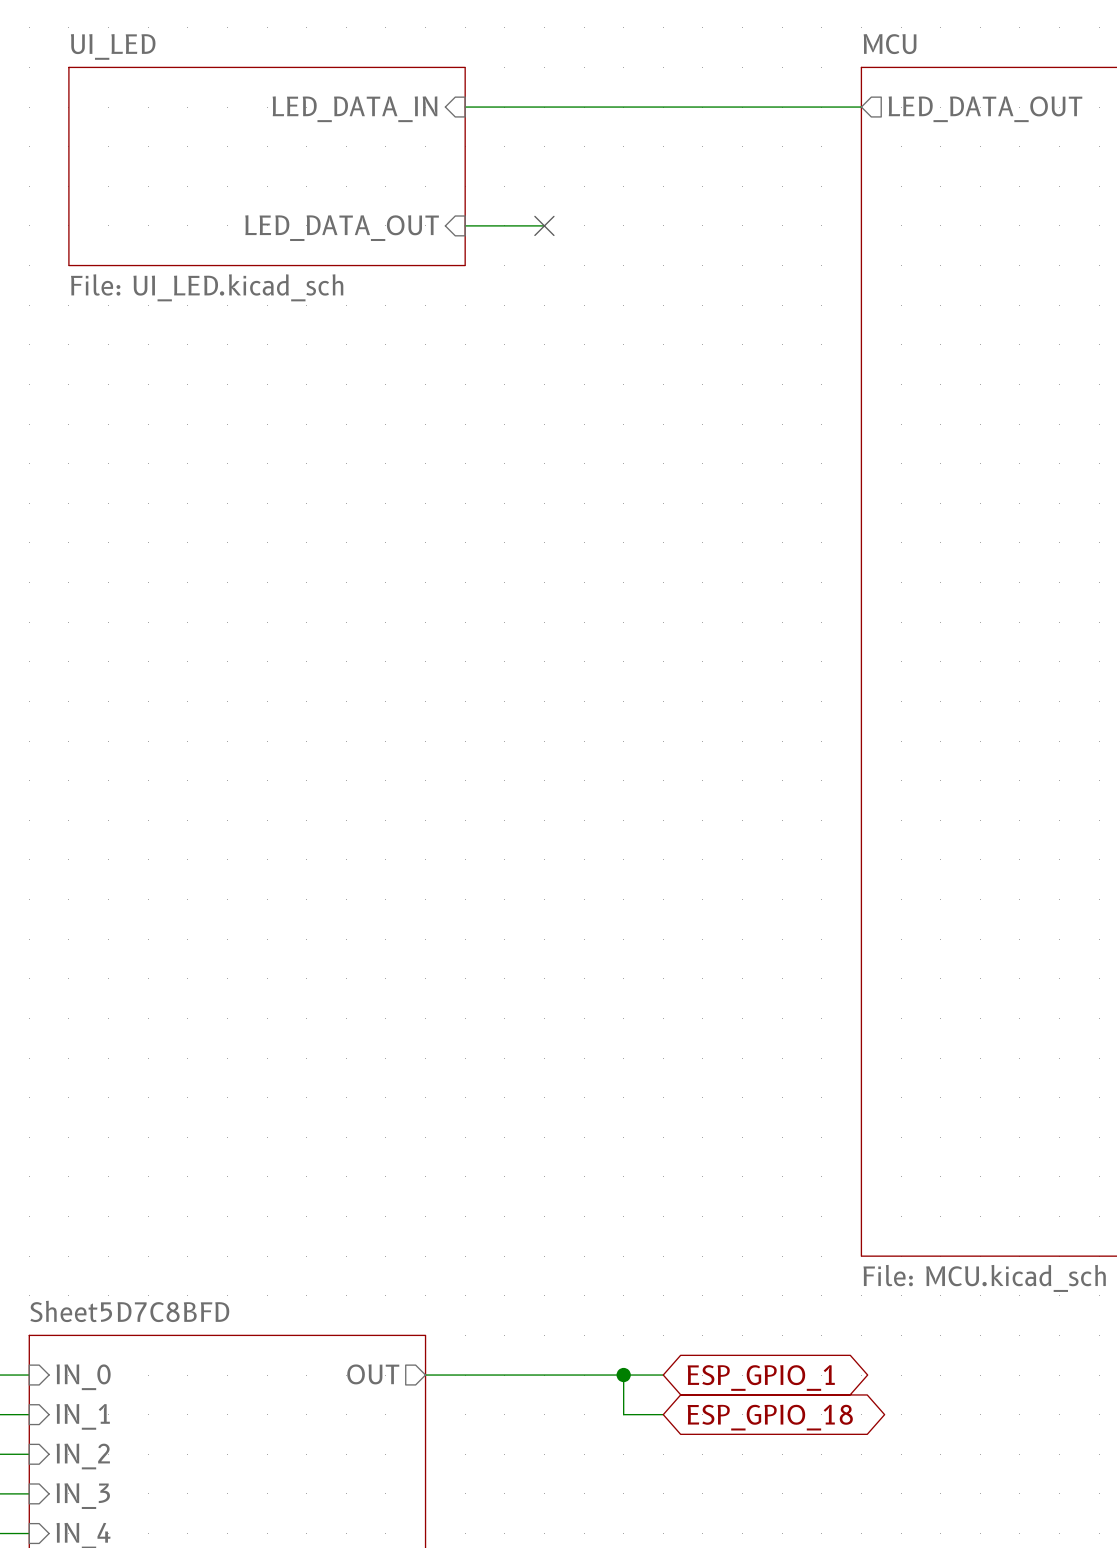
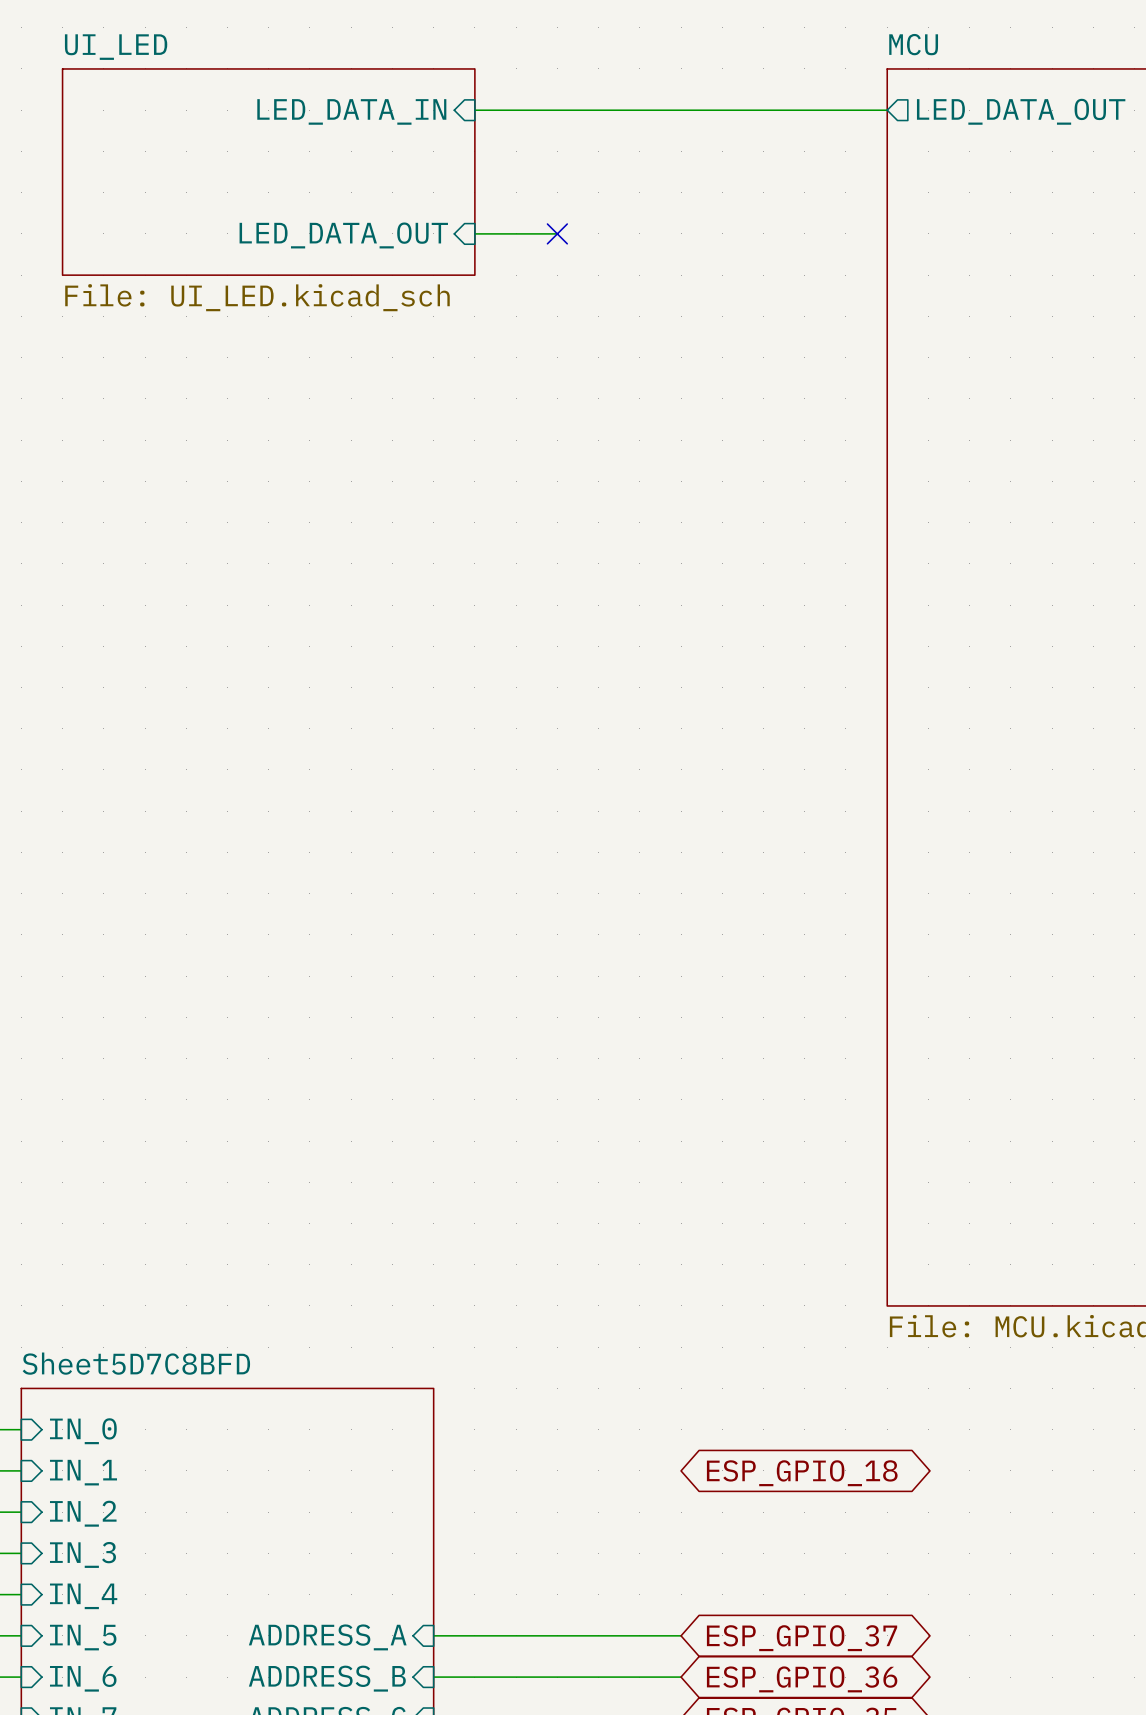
sheet pin: OUT (373, 1374) -> none
wire: (425, 1375) (663, 1375) -> none
wire: (623, 1375) (623, 1414) (663, 1414) -> none
junction: (623, 1375) -> none
global label: ESP_GPIO_1 (761, 1377) -> none

